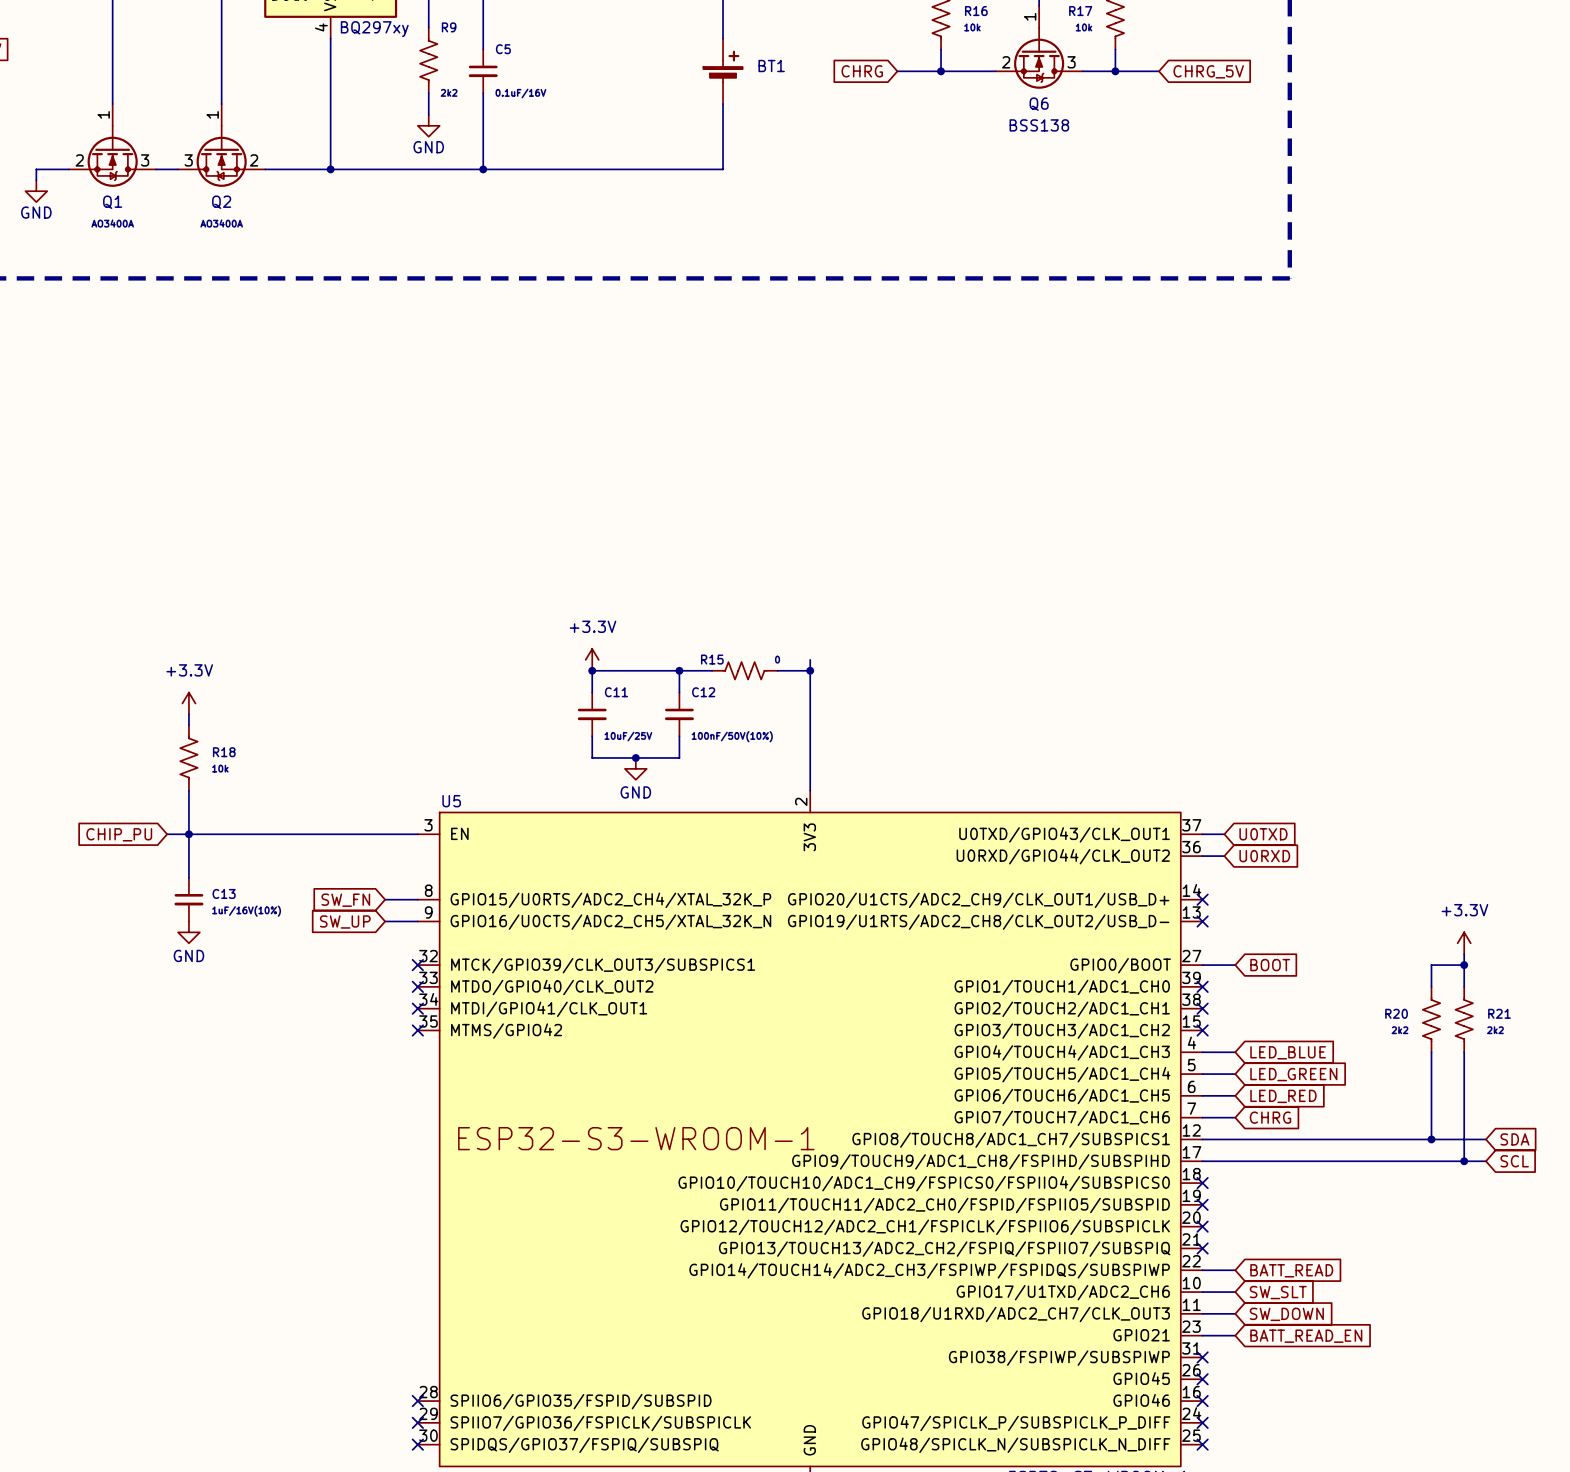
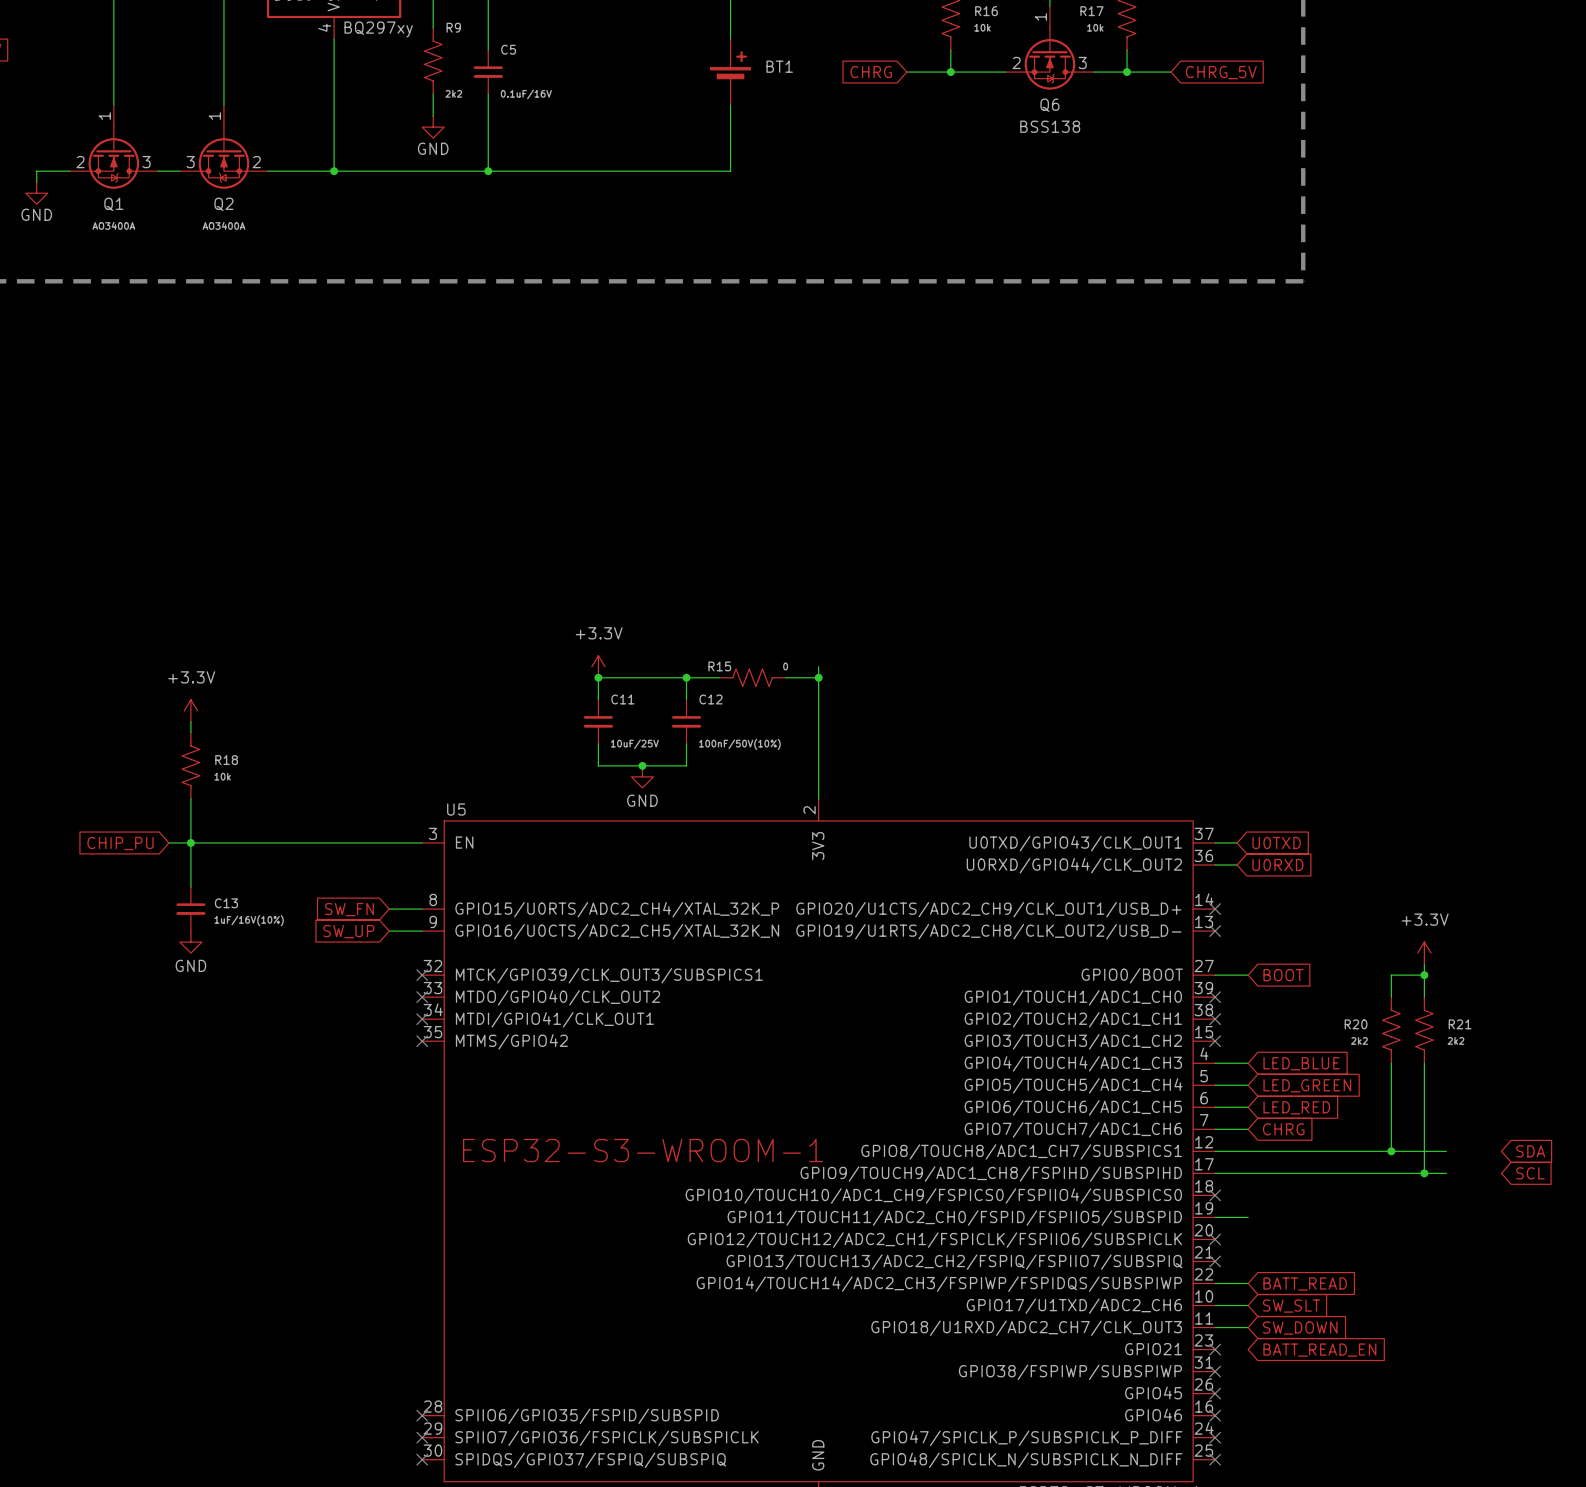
power symbol position: +3.3V (1464, 943) -> +3.3V (1424, 953)
wire: (1464, 954) (1464, 986) -> (1424, 964) (1424, 997)
junction: none -> (1424, 975)
wire: (1464, 965) (1431, 965) (1431, 986) -> (1424, 975) (1391, 975) (1391, 997)
junction: (1464, 965) -> none
R20 position: (1431, 1019) -> (1391, 1030)
R21 position: (1464, 1019) -> (1424, 1030)
wire: none -> (1391, 1063) (1391, 1151)
wire: (1431, 1052) (1431, 1139) (1485, 1139) -> none
wire: (1464, 1052) (1464, 1161) -> (1424, 1063) (1424, 1173)
junction: none -> (1391, 1151)
junction: (1431, 1139) -> none
junction: none -> (1424, 1173)
wire: (1431, 1161) (1485, 1161) -> none
junction: (1464, 1161) -> none
no-connect mark: (1202, 1204) -> none
wire: (1202, 1335) (1235, 1335) -> (1215, 1217) (1248, 1217)
no-connect mark: none -> (1215, 1349)

